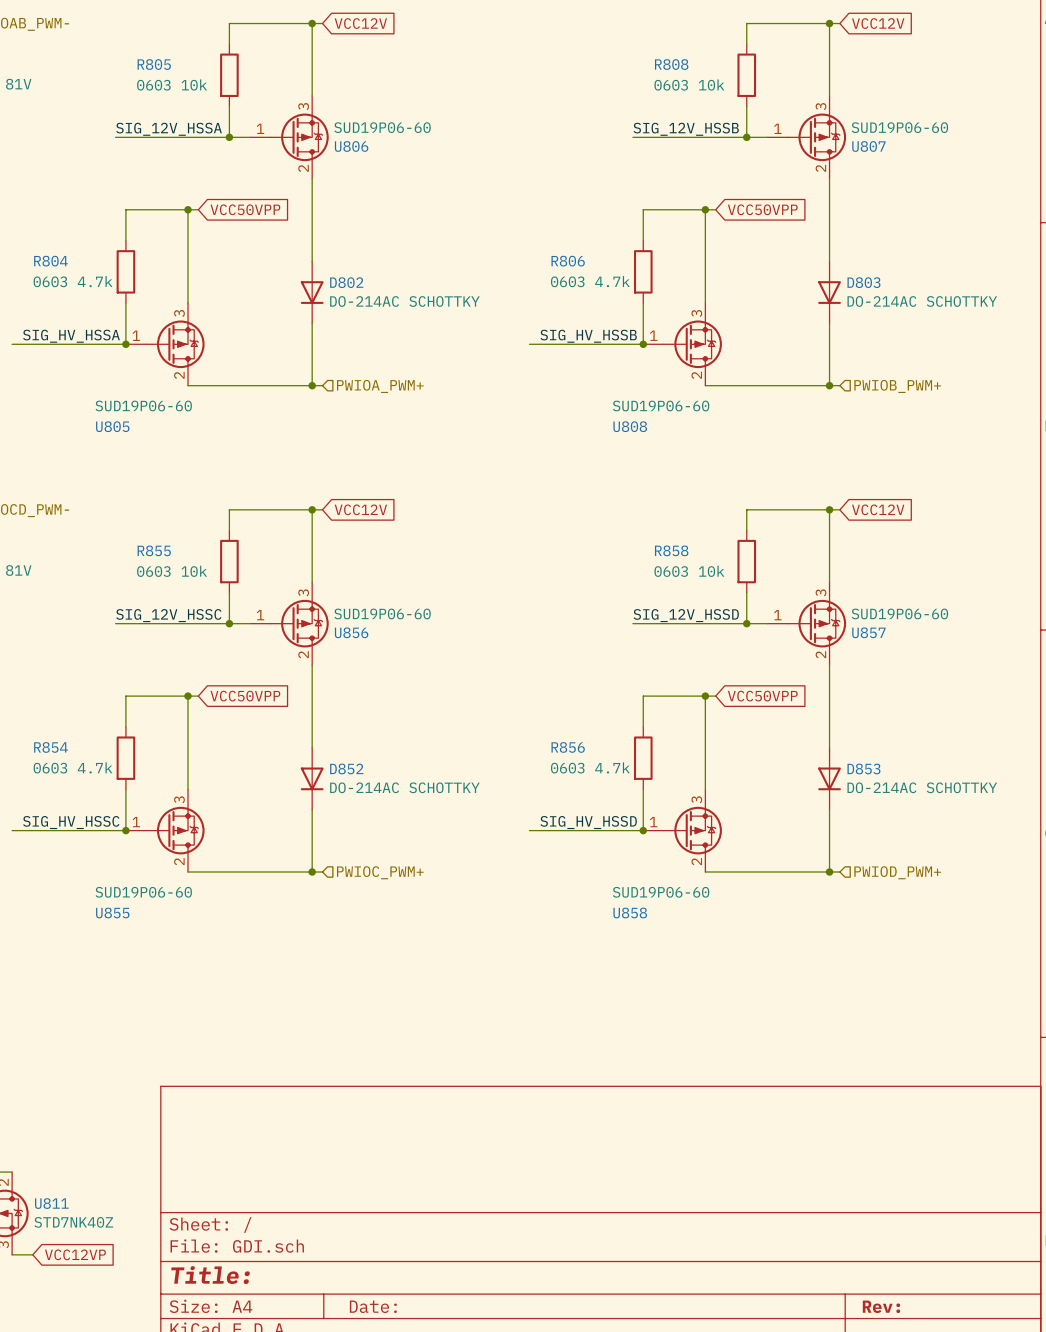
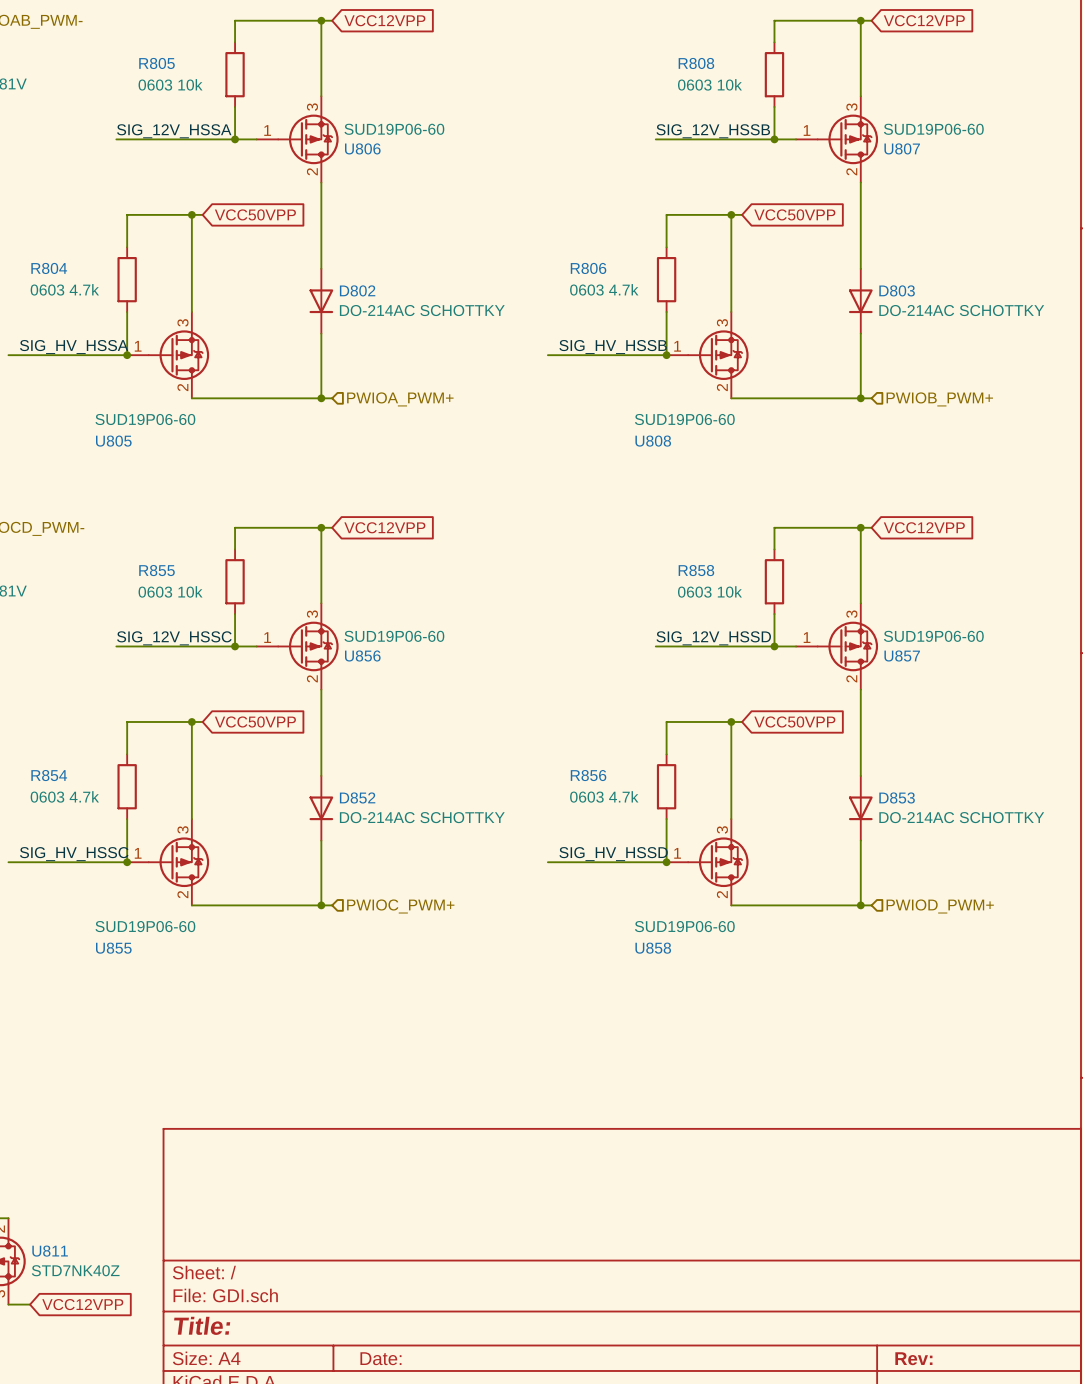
global label: VCC12V (360, 23) -> VCC12VPP (384, 20)
global label: VCC12V (878, 23) -> VCC12VPP (924, 20)
global label: VCC12V (360, 509) -> VCC12VPP (384, 527)
global label: VCC12V (878, 509) -> VCC12VPP (924, 527)
global label: VCC12VP (75, 1254) -> VCC12VPP (82, 1304)

